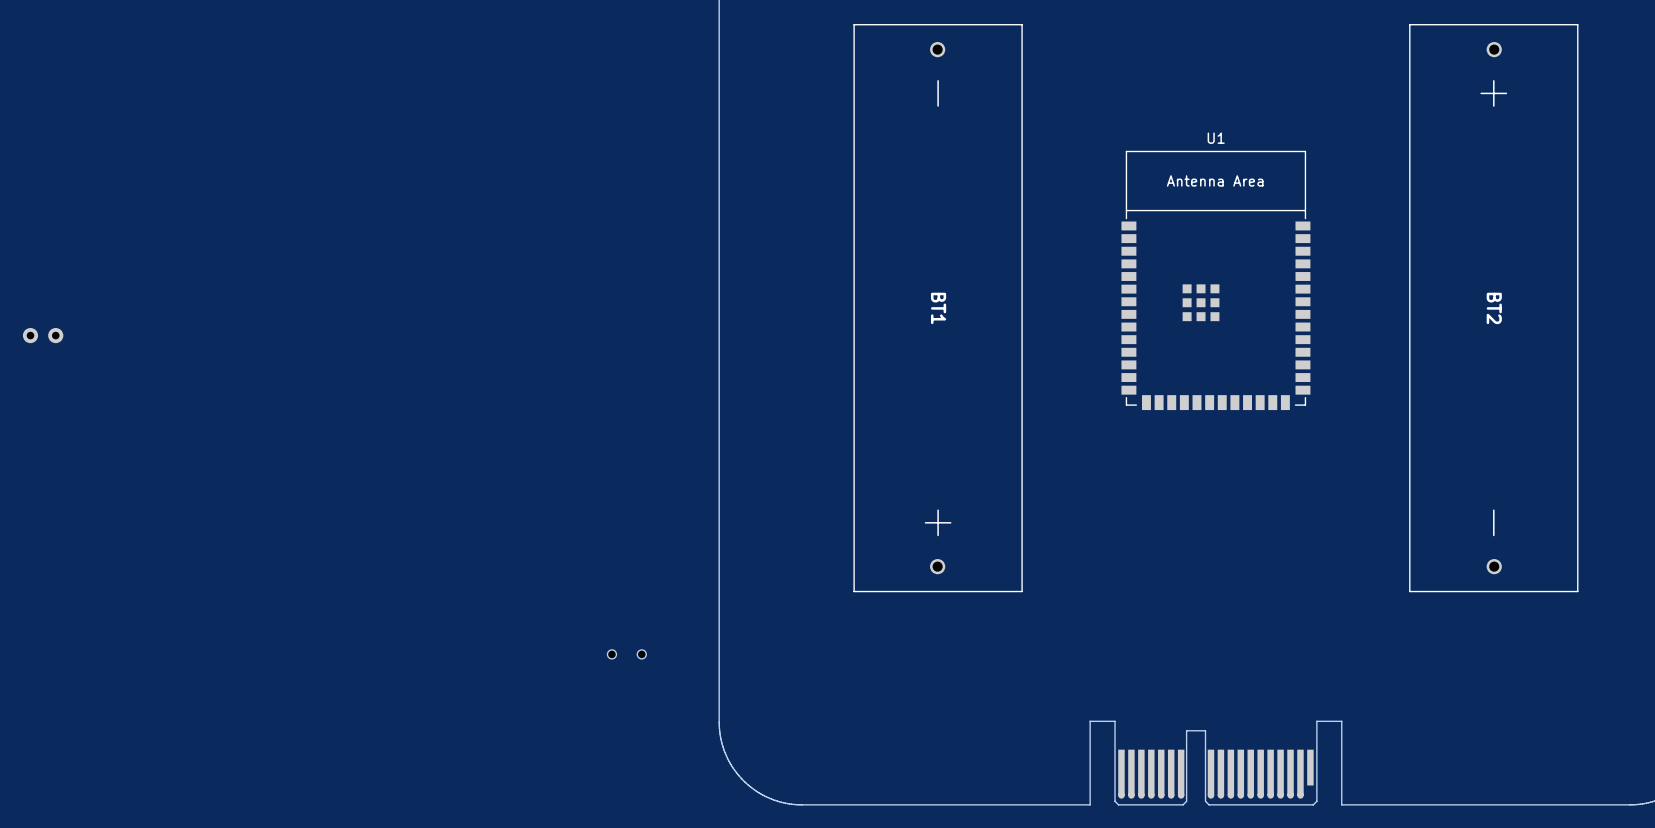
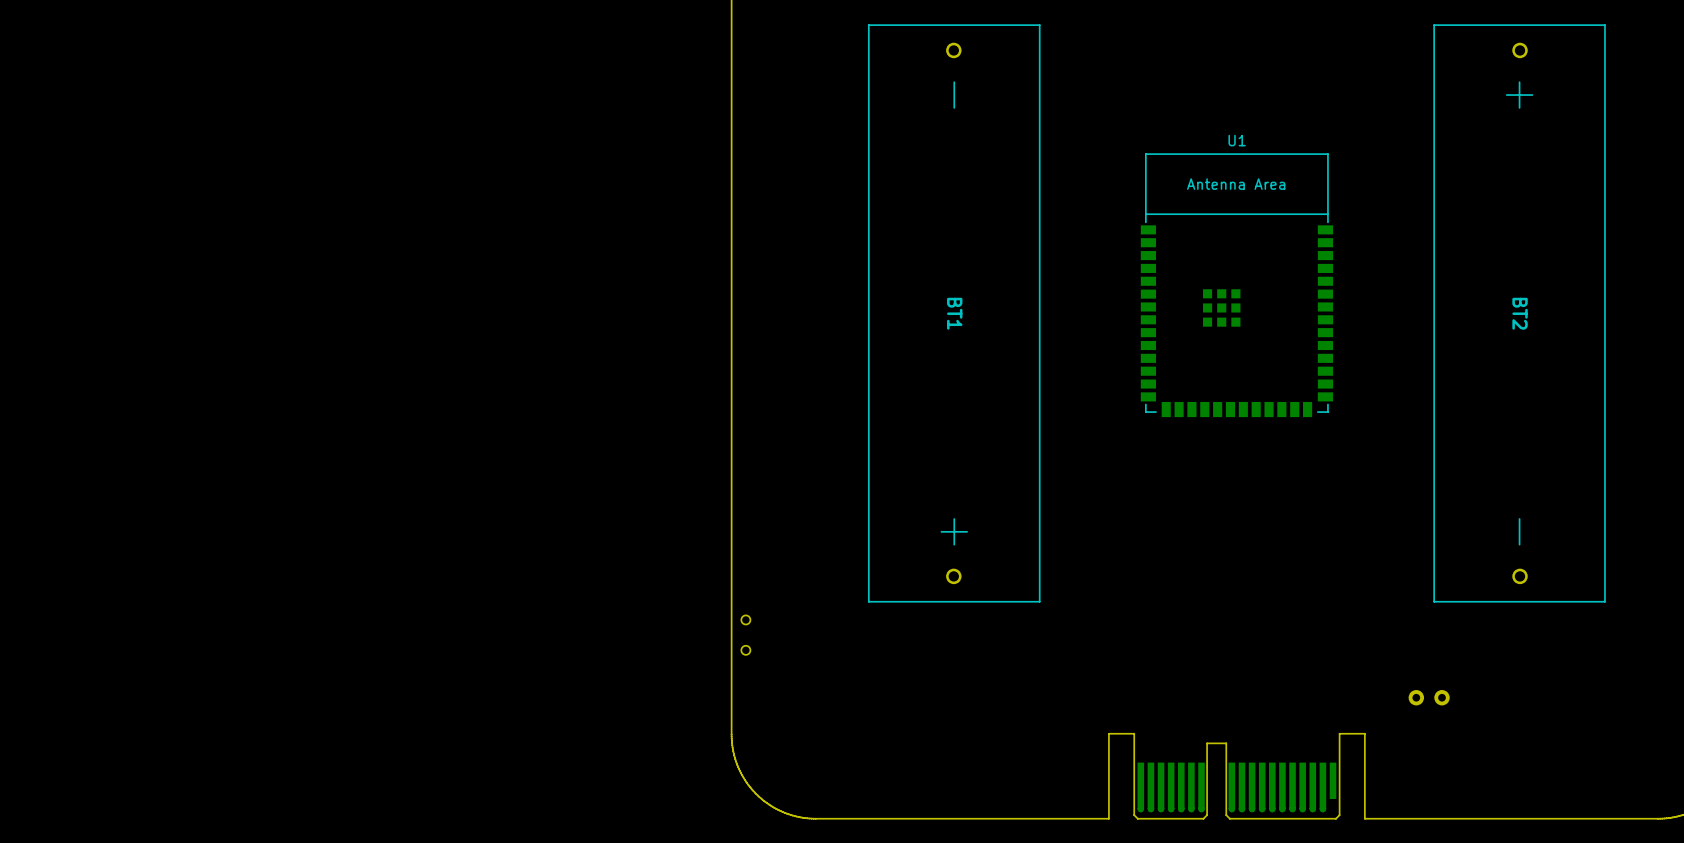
part: (43, 335) -> none
part rotation: 0° (626, 654) -> 90° clockwise (745, 635)
part position: (626, 654) -> (745, 635)
part: none -> (1429, 697)

